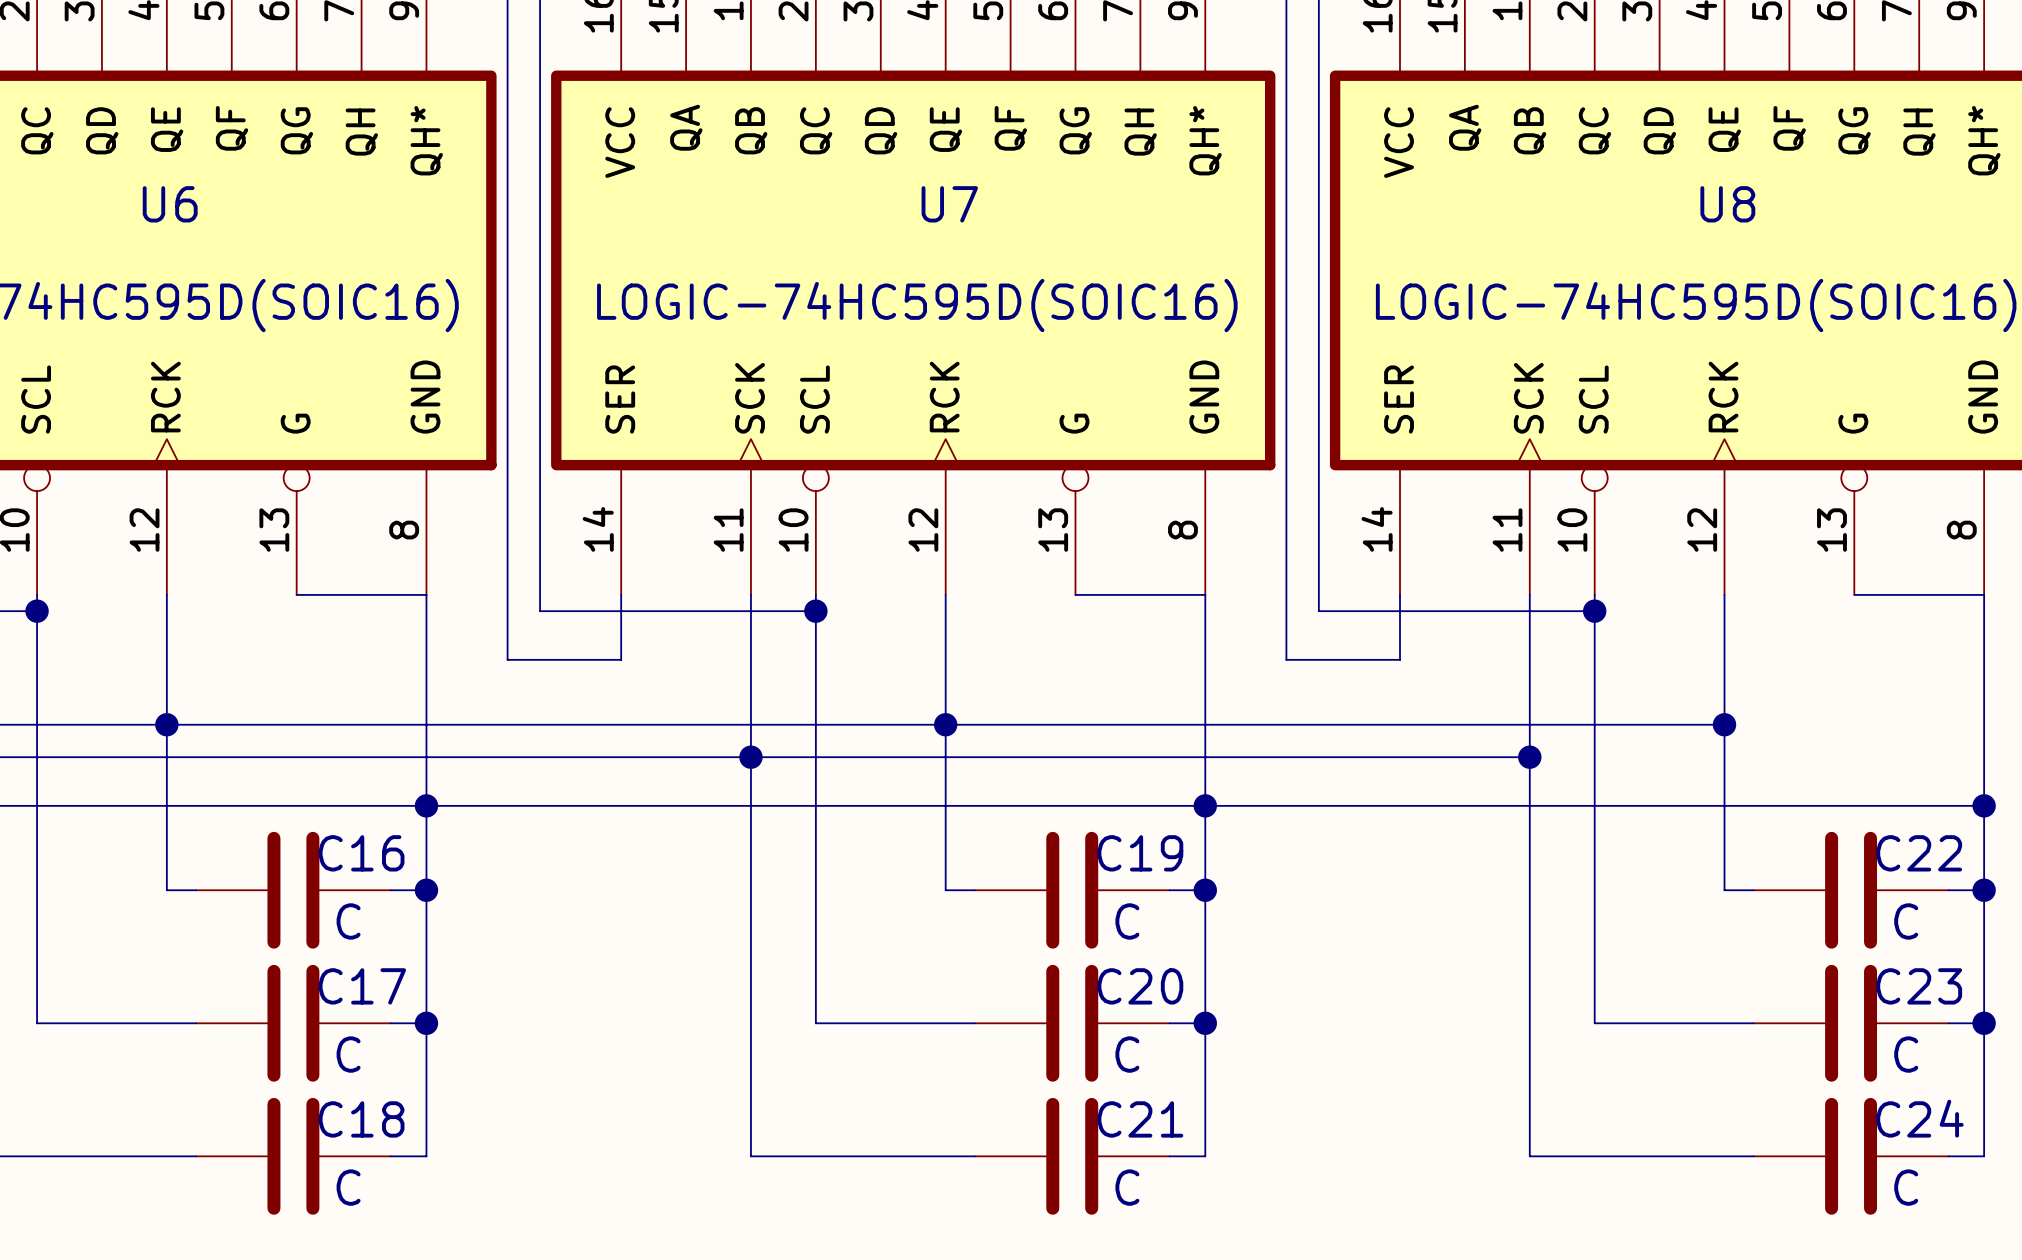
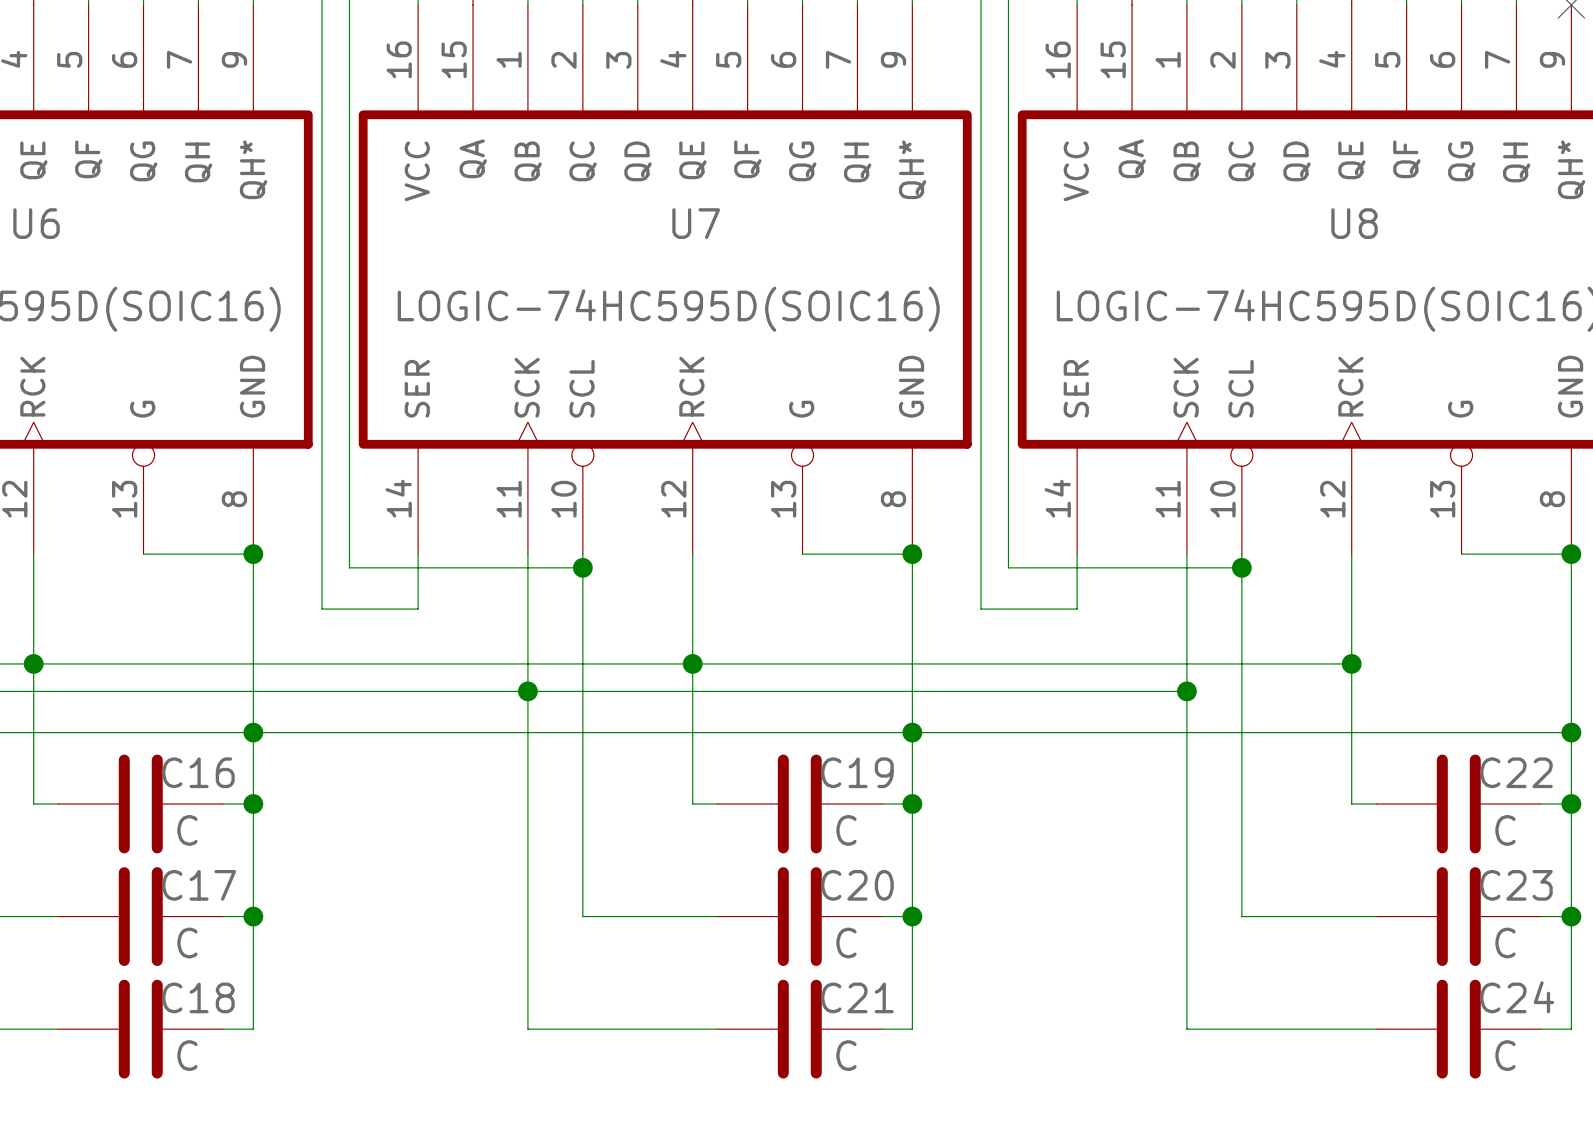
junction: none -> (253, 554)
junction: none -> (912, 554)
junction: none -> (1571, 554)

